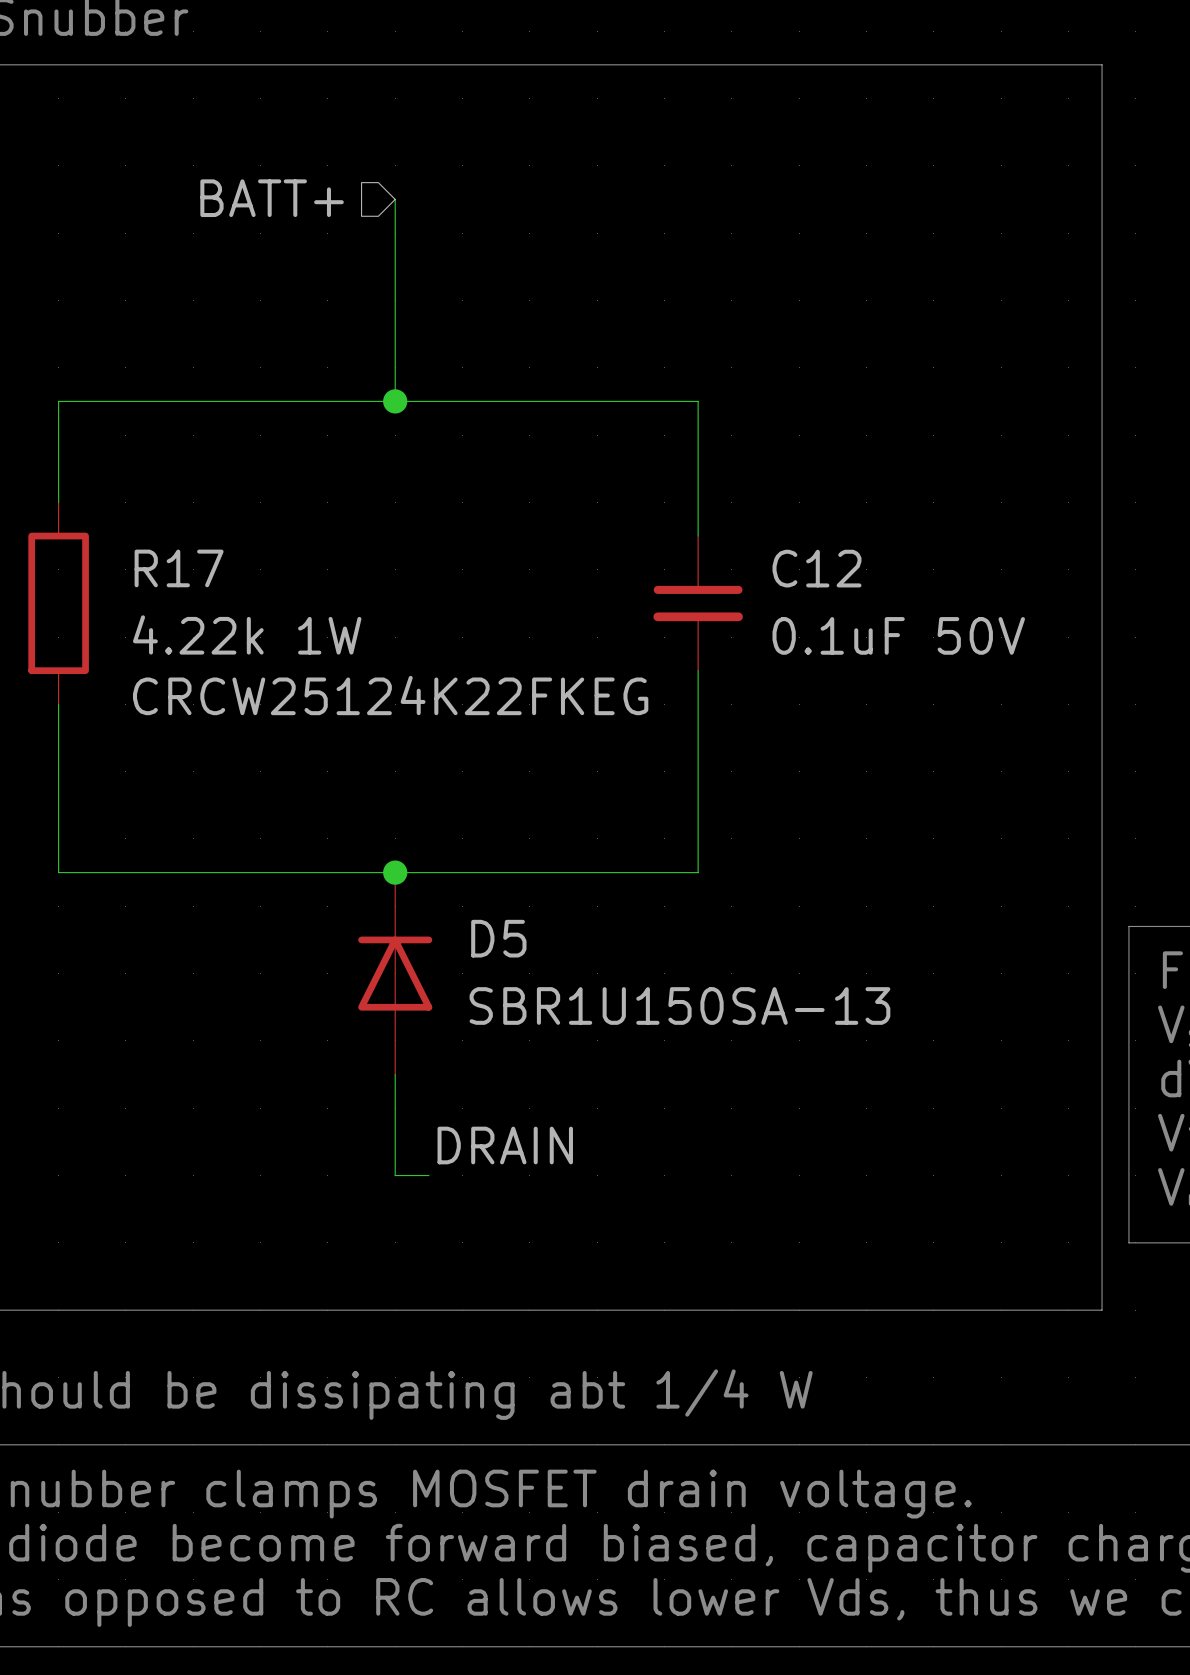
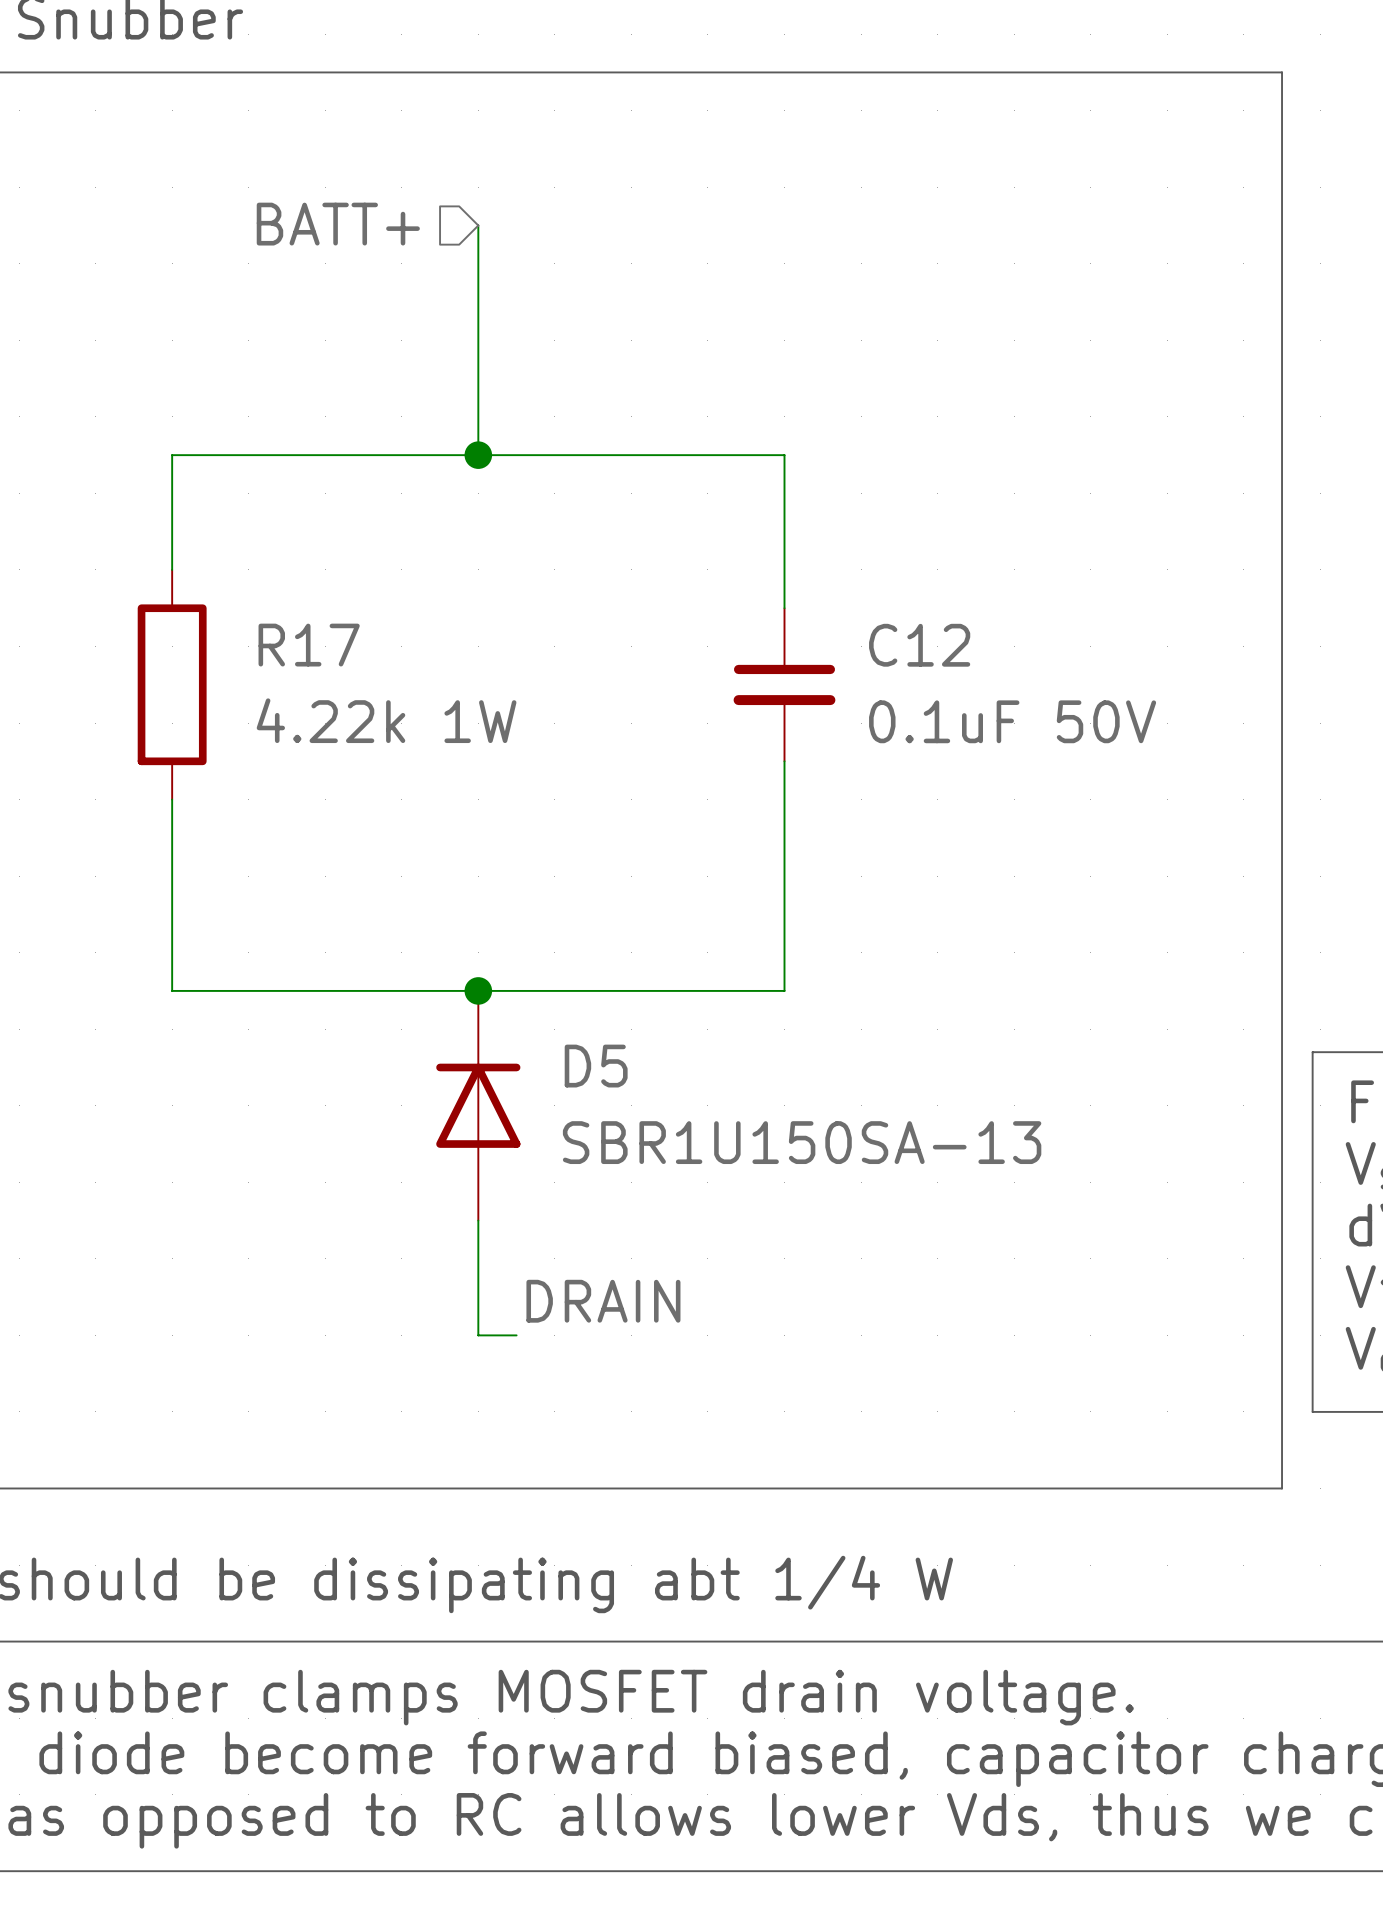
wire: (125, 401) (58, 401) (58, 502) -> (172, 455) (172, 569)
wire: (664, 401) (698, 401) (698, 536) -> (784, 455) (784, 608)
R17 position: (58, 603) -> (172, 684)
C12 position: (698, 603) -> (784, 684)
wire: (698, 670) (698, 872) (664, 872) -> (784, 761) (784, 990)
R17 text: CRCW25124K22FKEG (390, 695) -> none
wire: (58, 704) (58, 872) (125, 872) -> (172, 799) (172, 990)

